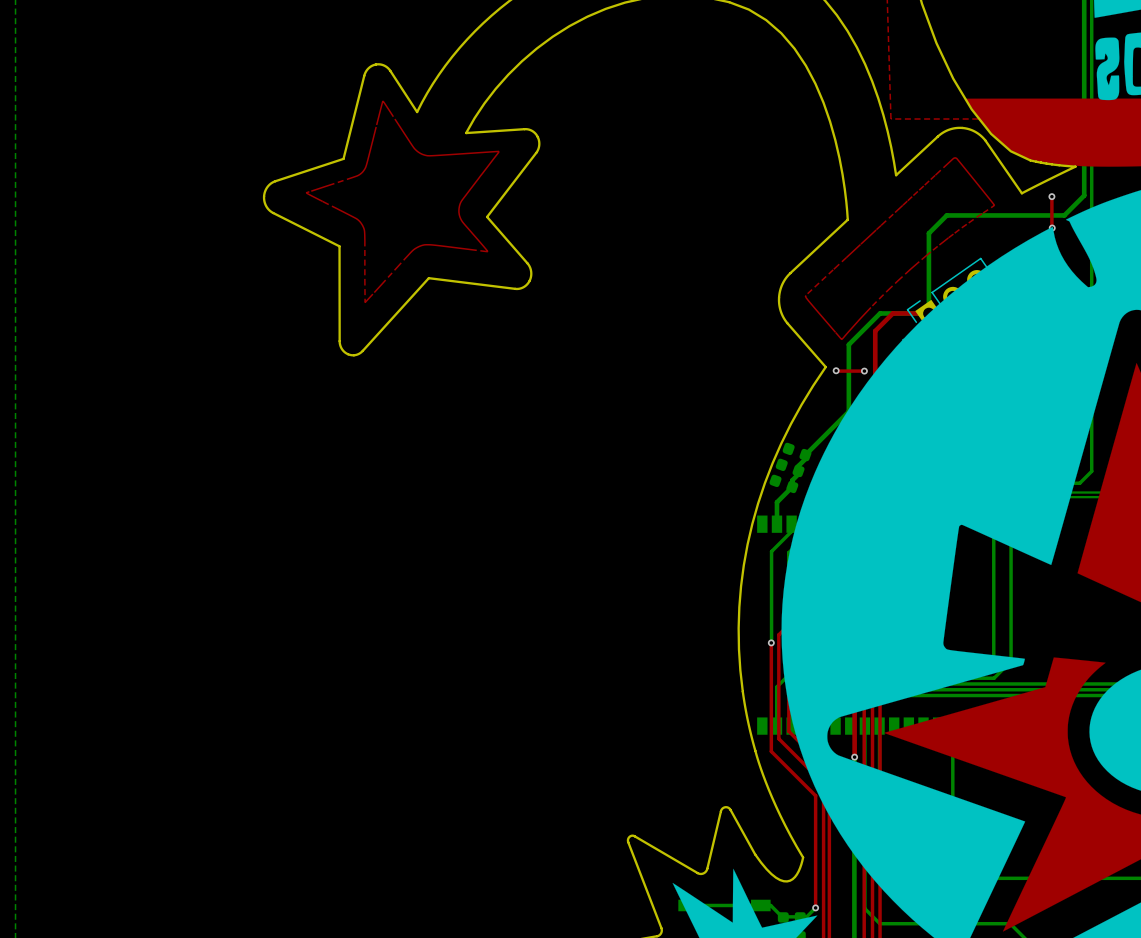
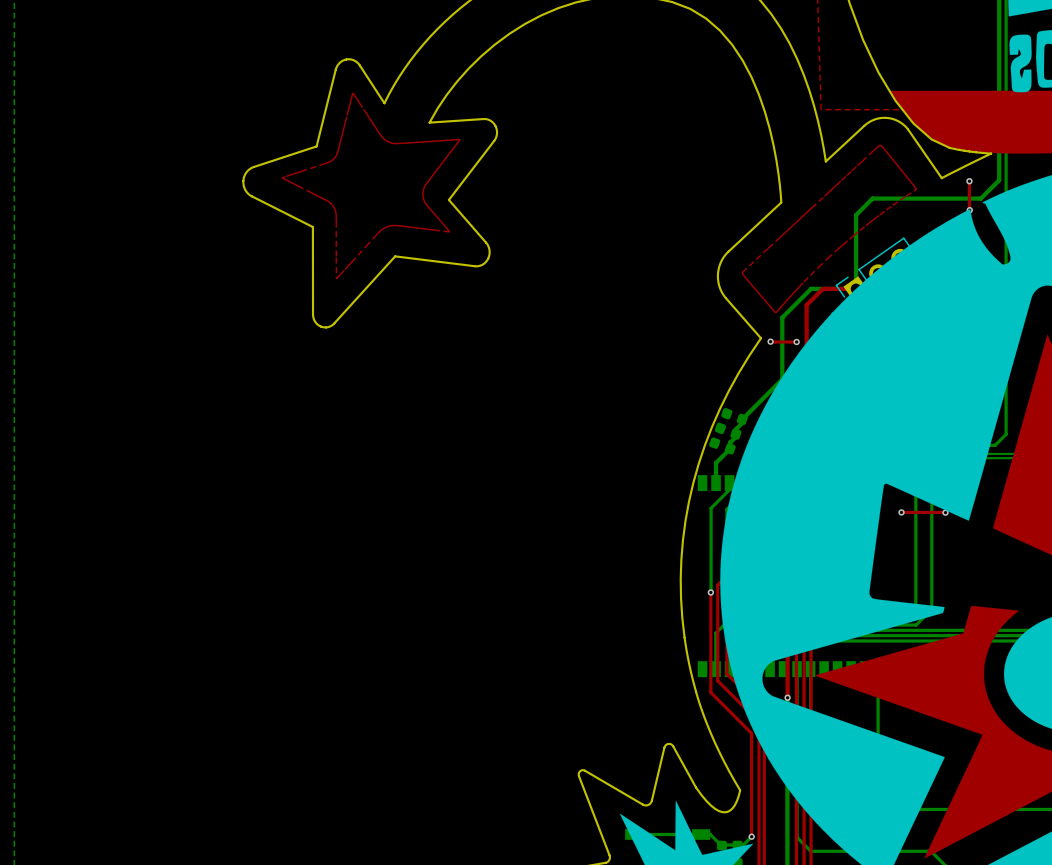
top track: none -> (901, 512) (945, 512)
via: none -> (901, 512)
via: none -> (945, 512)

